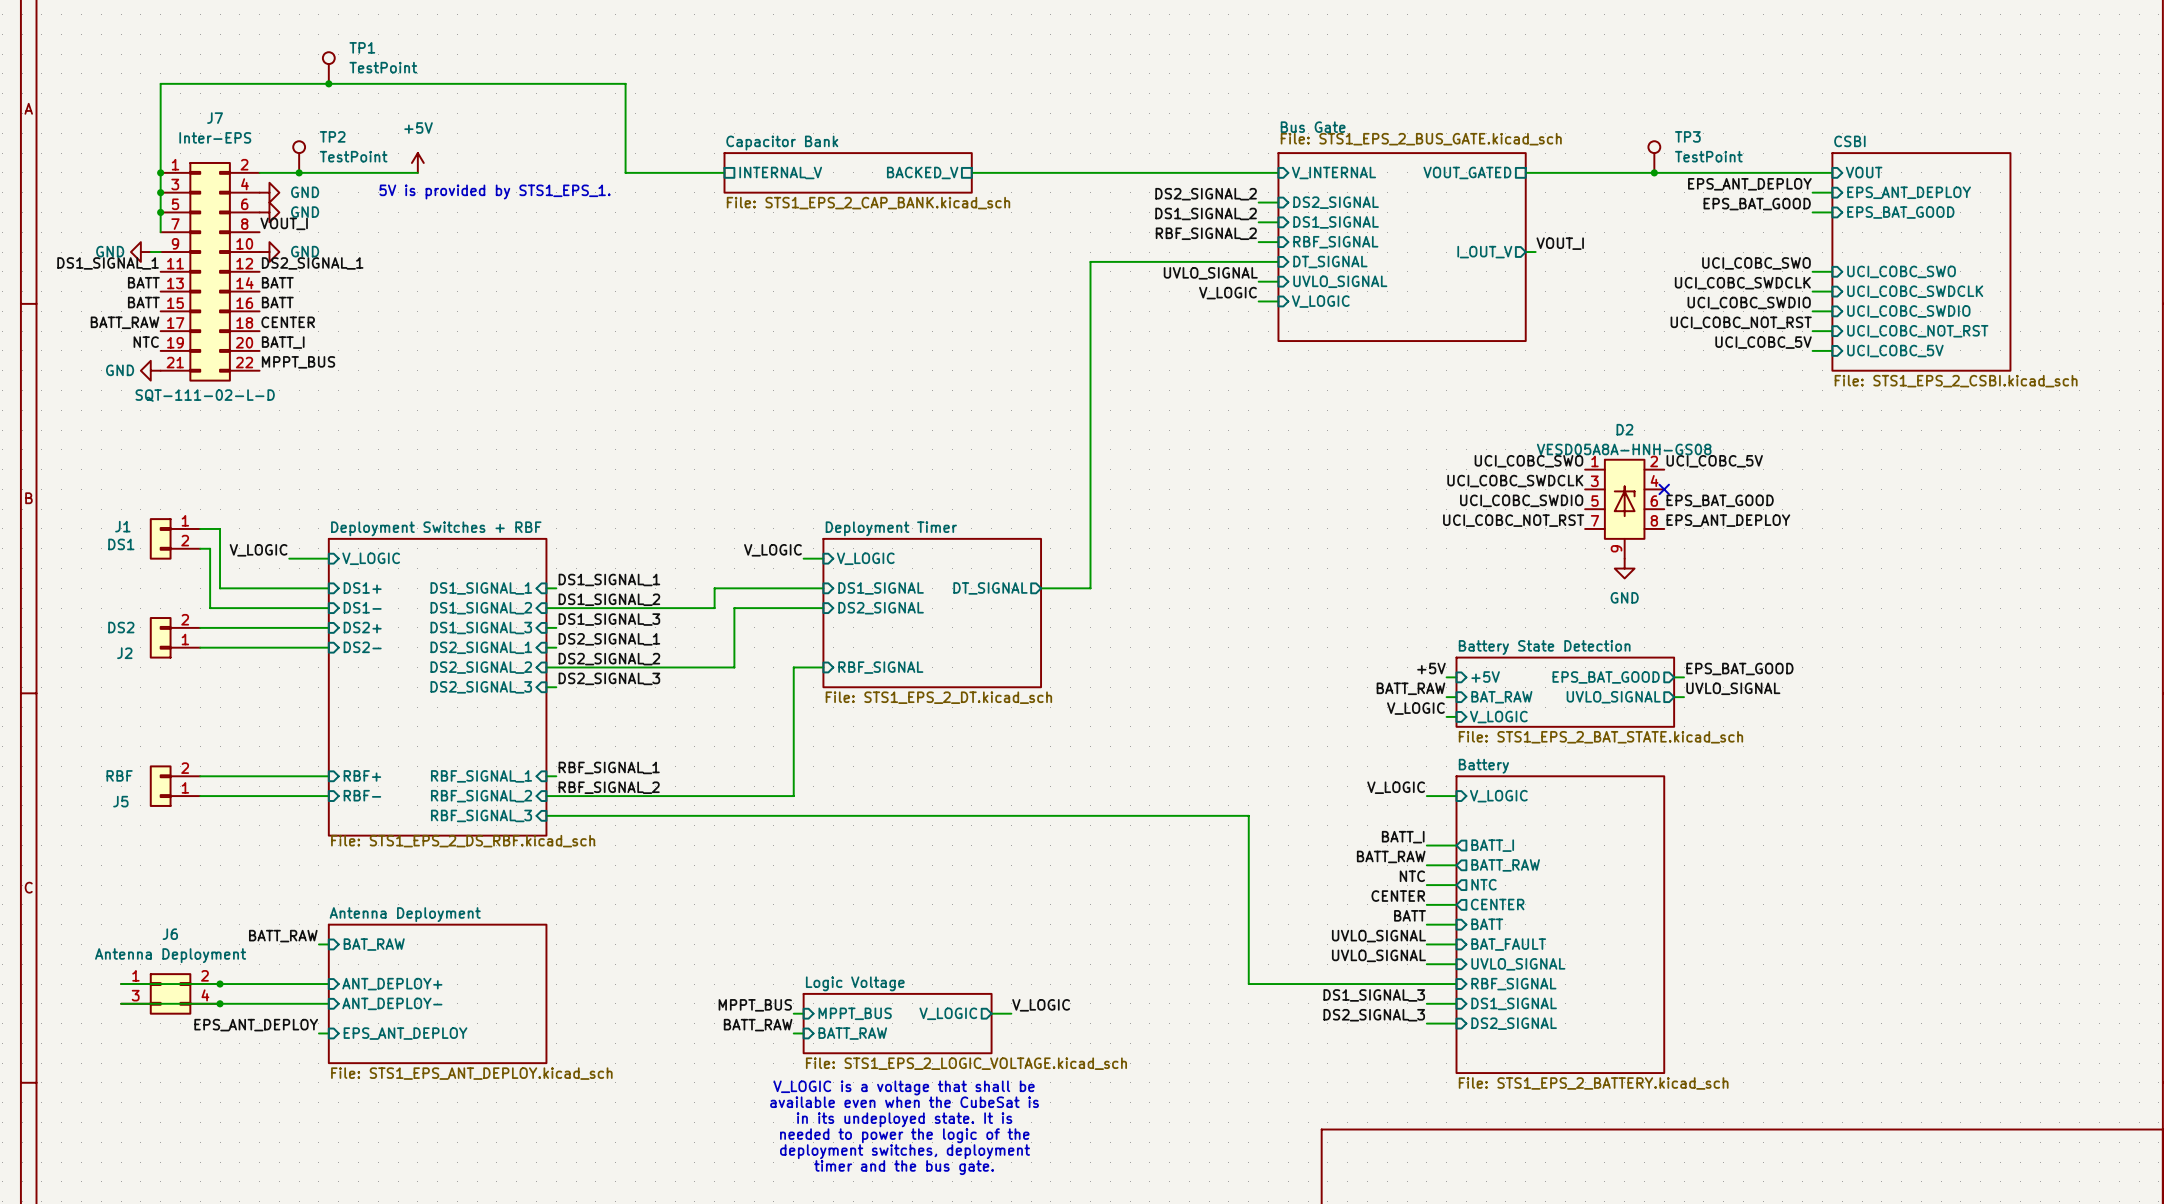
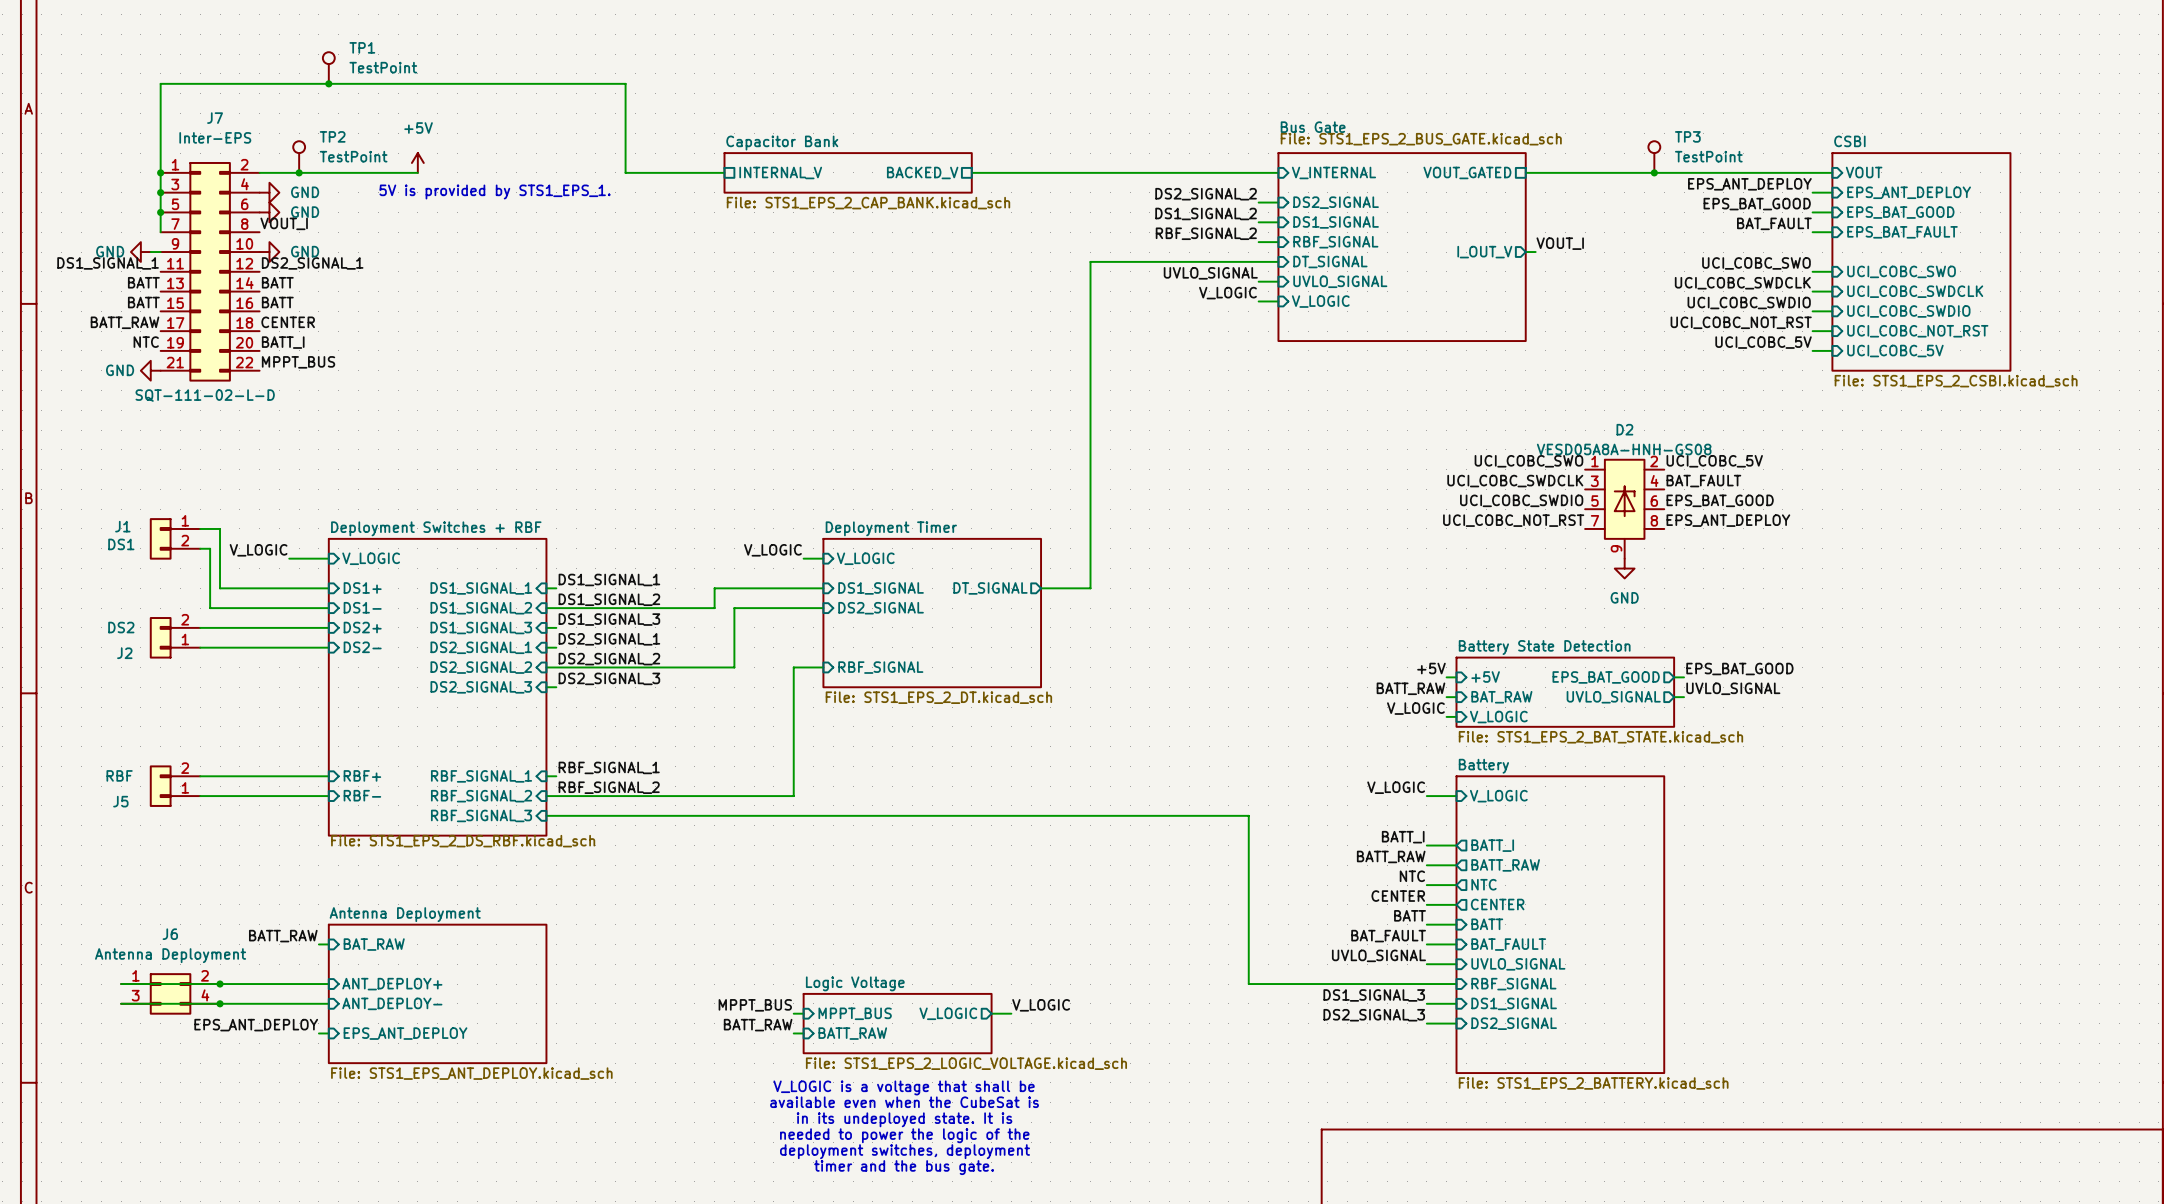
label: none -> BAT_FAULT (1774, 223)
wire: none -> (1812, 232) (1832, 232)
sheet pin: none -> EPS_BAT_FAULT (1902, 232)
label: none -> BAT_FAULT (1703, 481)
no-connect mark: (1664, 489) -> none
label: UVLO_SIGNAL (1378, 936) -> BAT_FAULT (1388, 936)

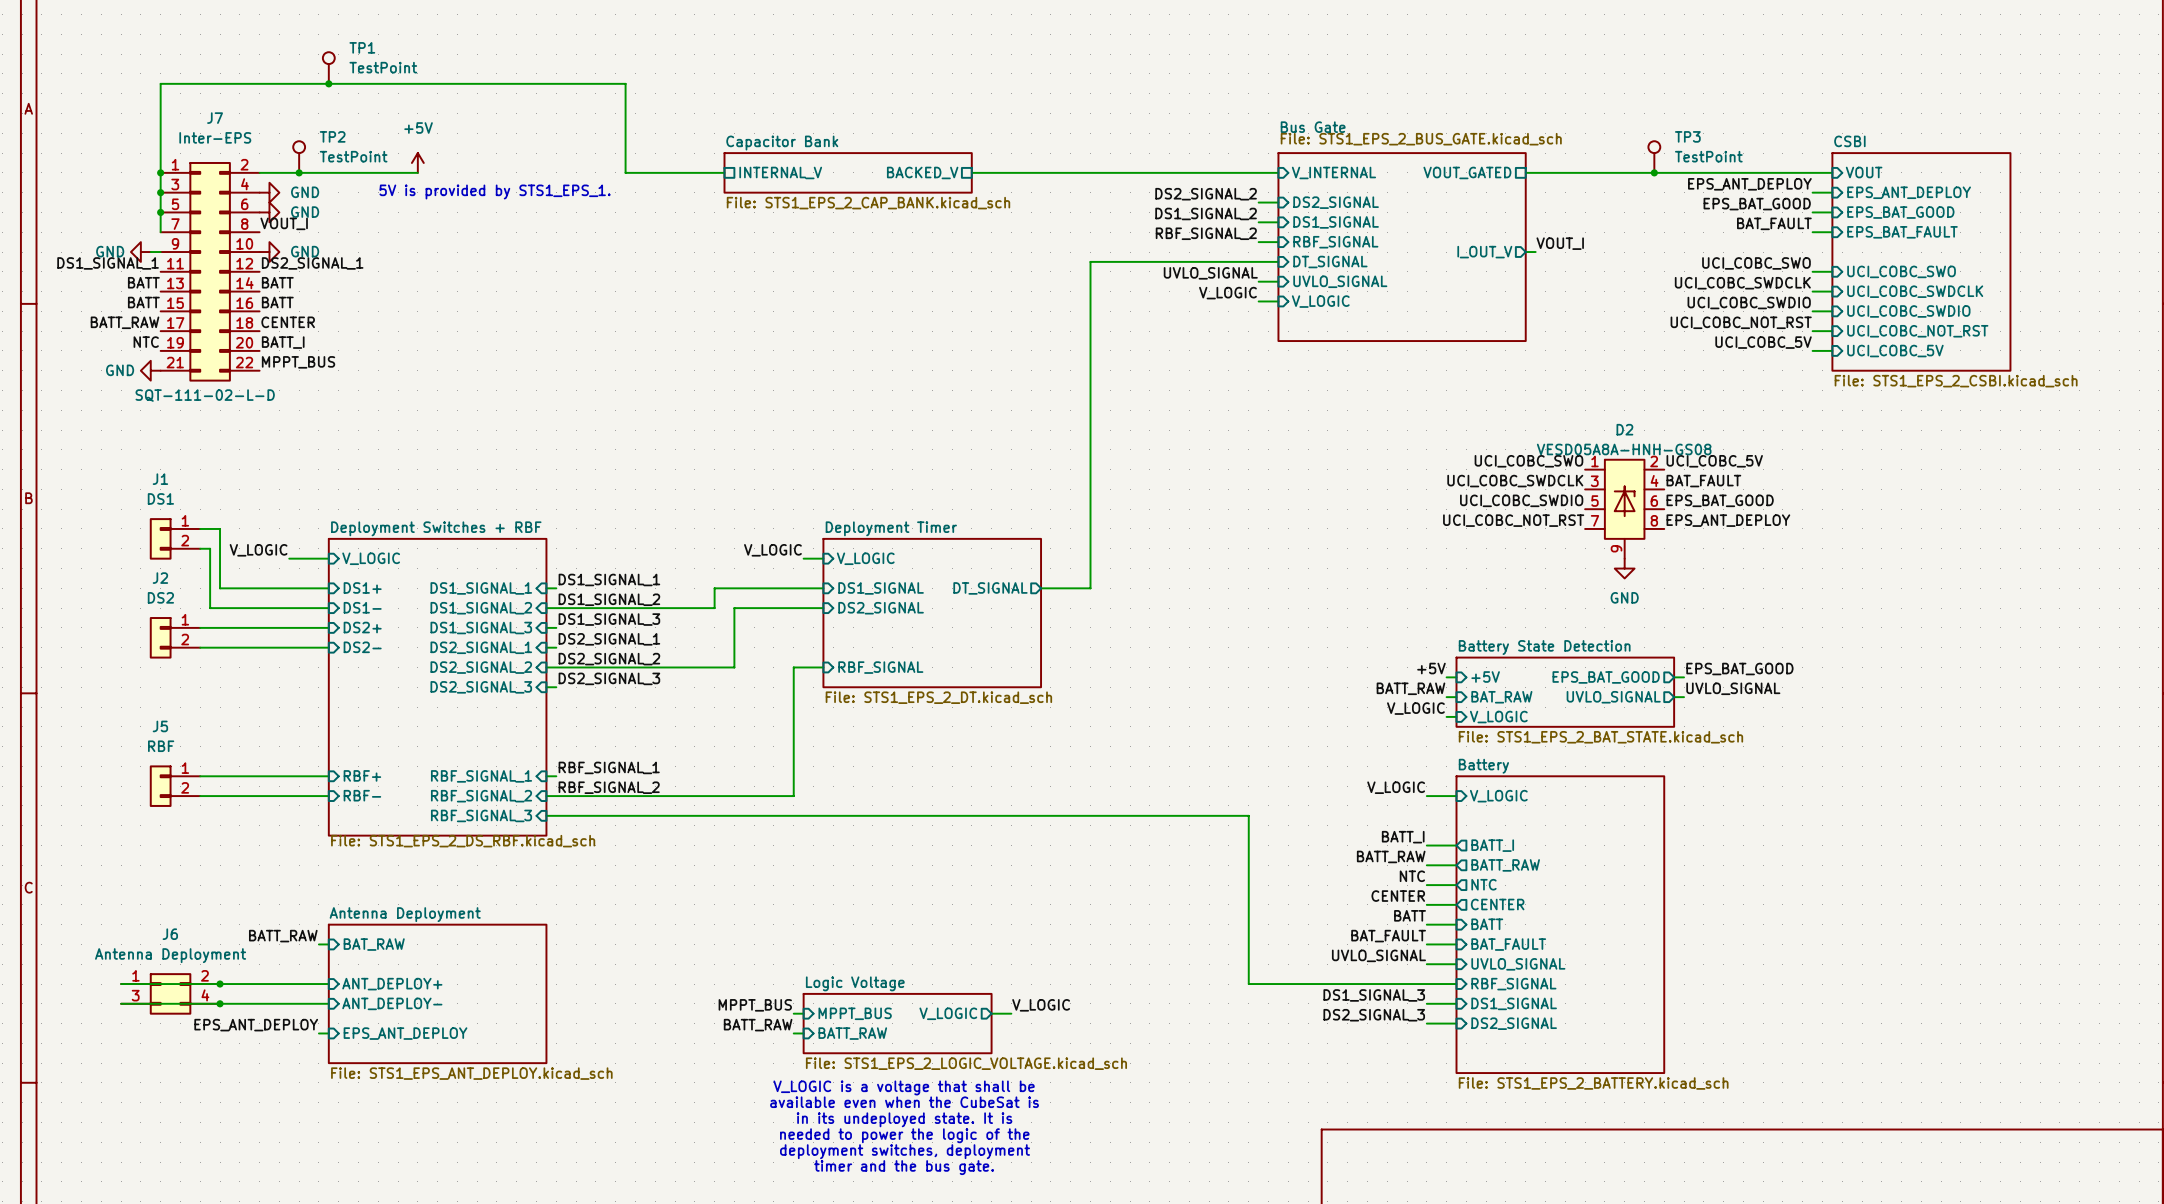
J1 name position: J1 (122, 526) -> J1 (160, 479)
J1 value position: DS1 (121, 544) -> DS1 (160, 498)
J2 value position: DS2 (121, 627) -> DS2 (160, 597)
J2 flip: as is (160, 637) -> up-down (160, 637)
J2 name position: J2 (124, 653) -> J2 (160, 578)
J5 value position: RBF (119, 775) -> RBF (161, 746)
J5 flip: as is (160, 786) -> up-down (160, 786)
J5 name position: J5 (120, 801) -> J5 (160, 726)

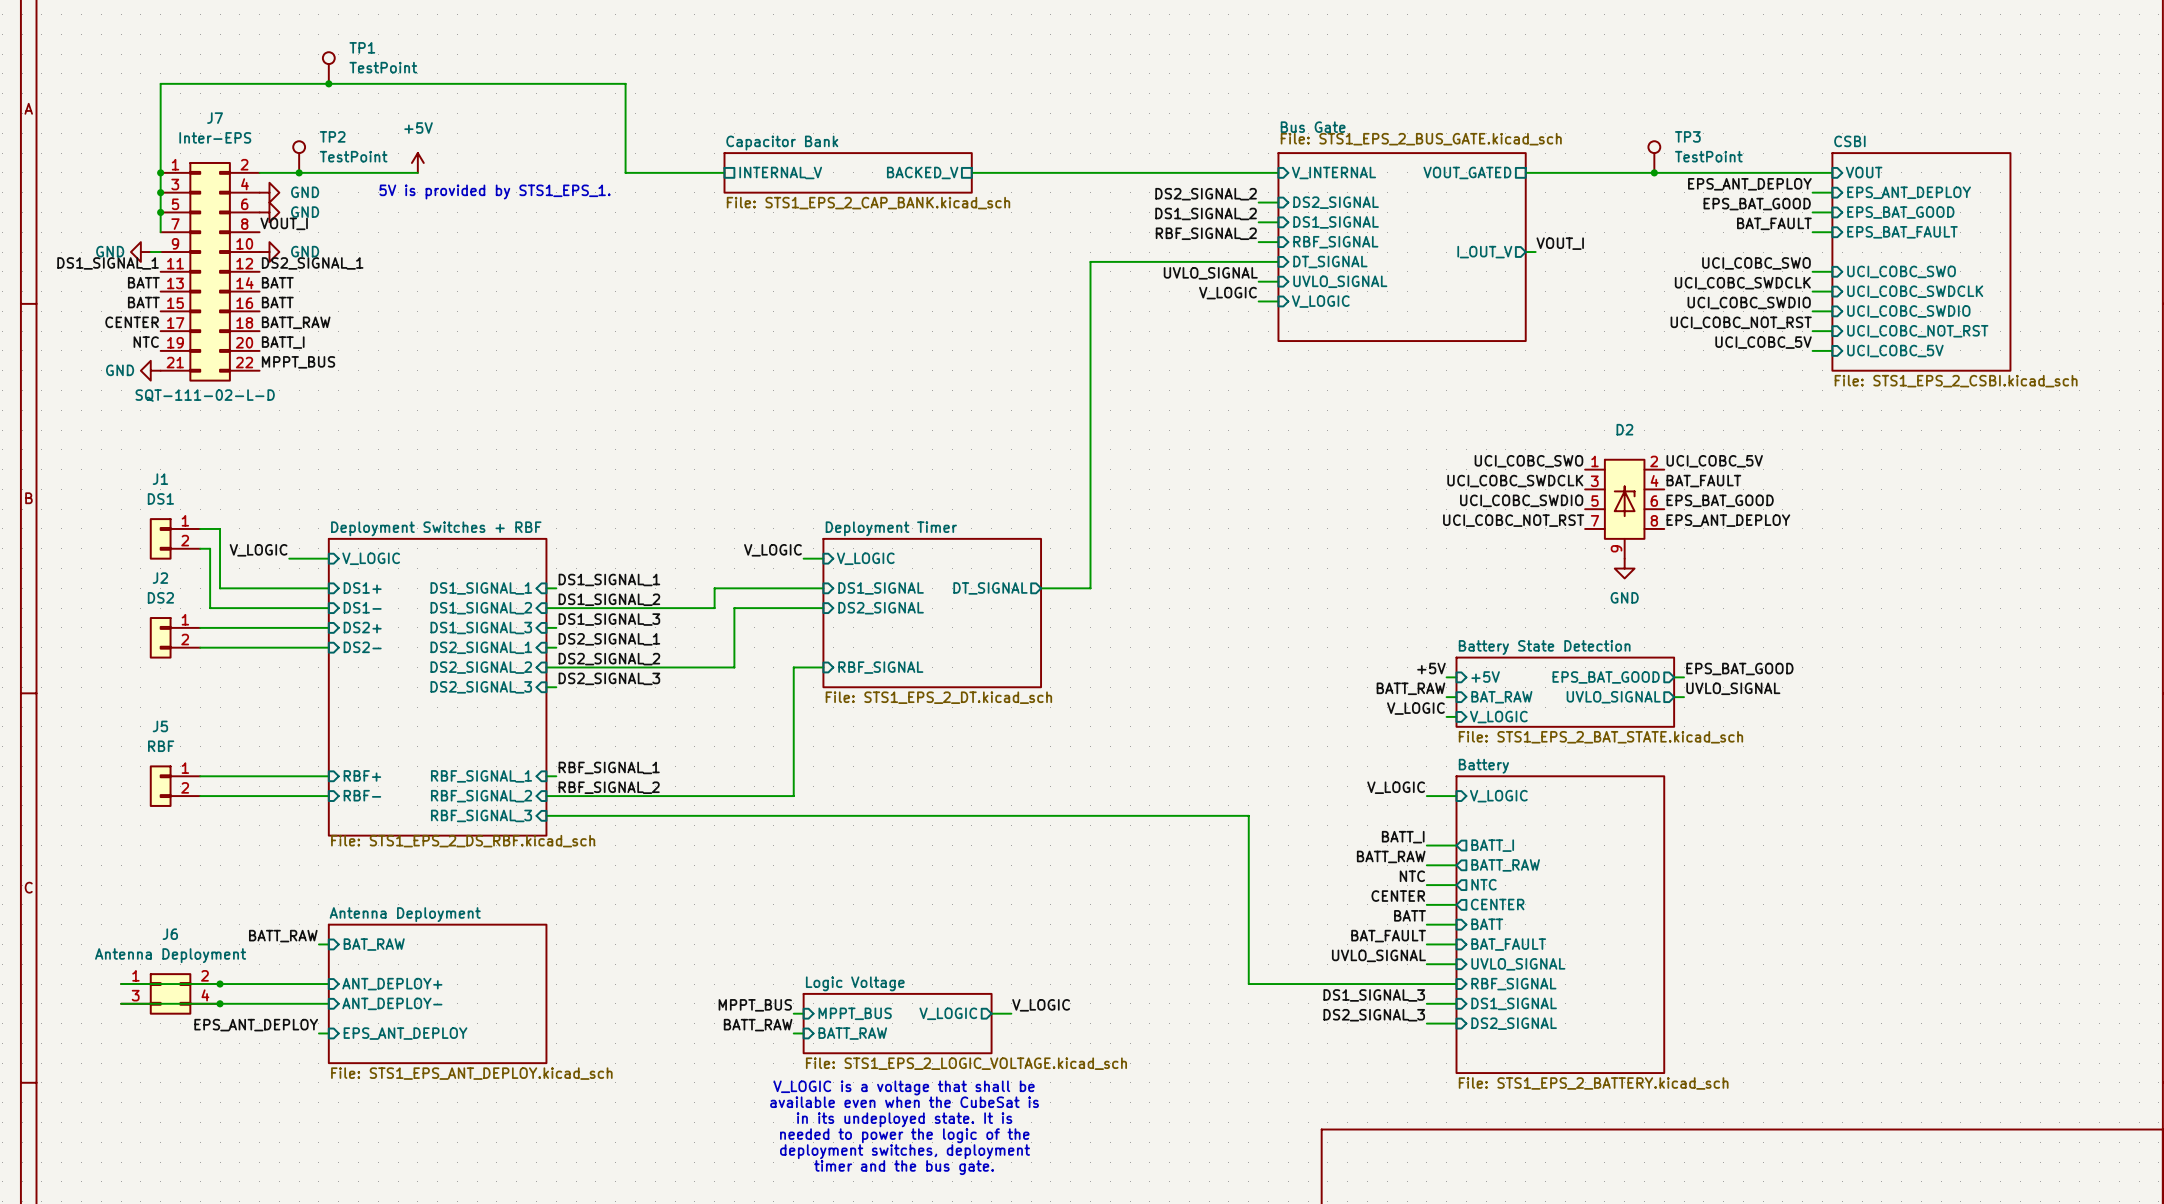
label: BATT_RAW (125, 322) -> CENTER (132, 322)
label: CENTER (288, 322) -> BATT_RAW (296, 322)
D2 value: VESD05A8A-HNH-GS08 (1624, 449) -> none

